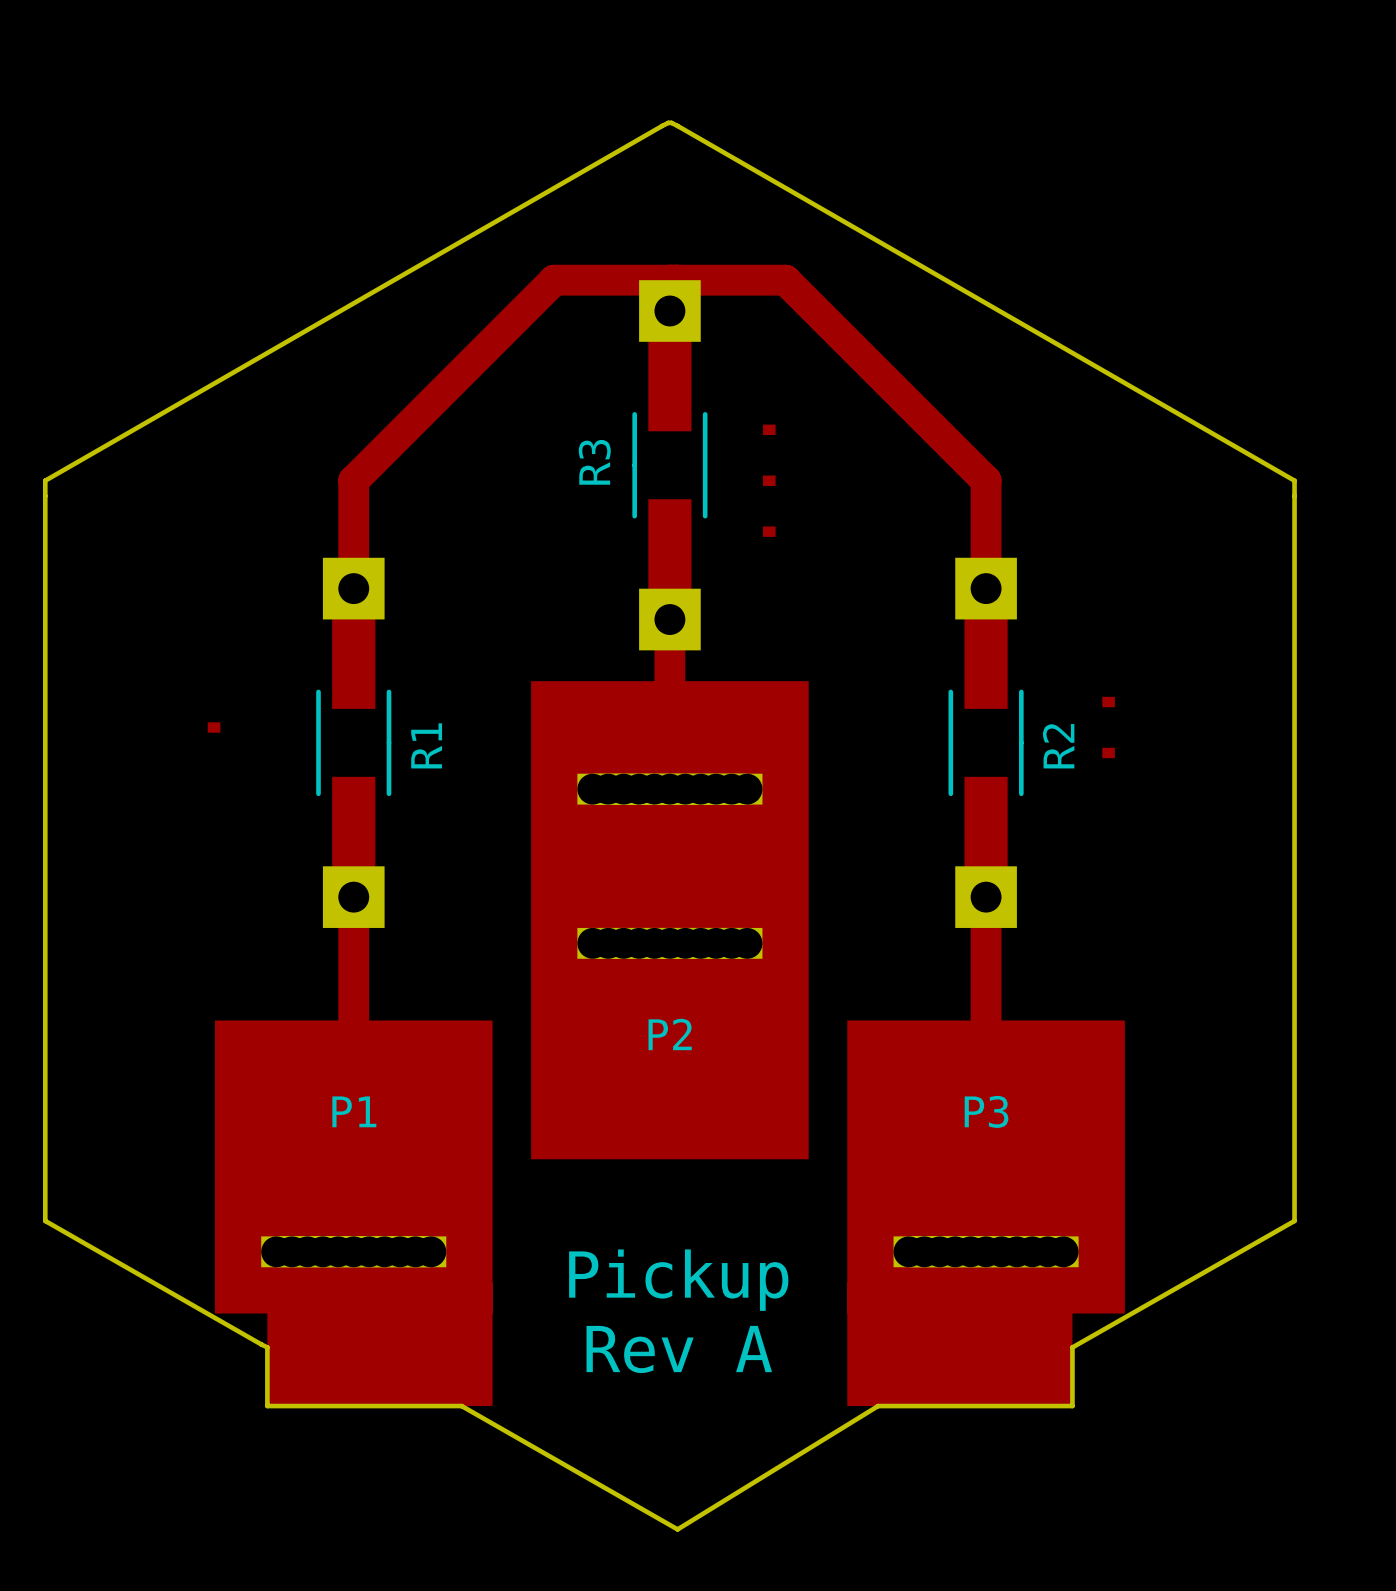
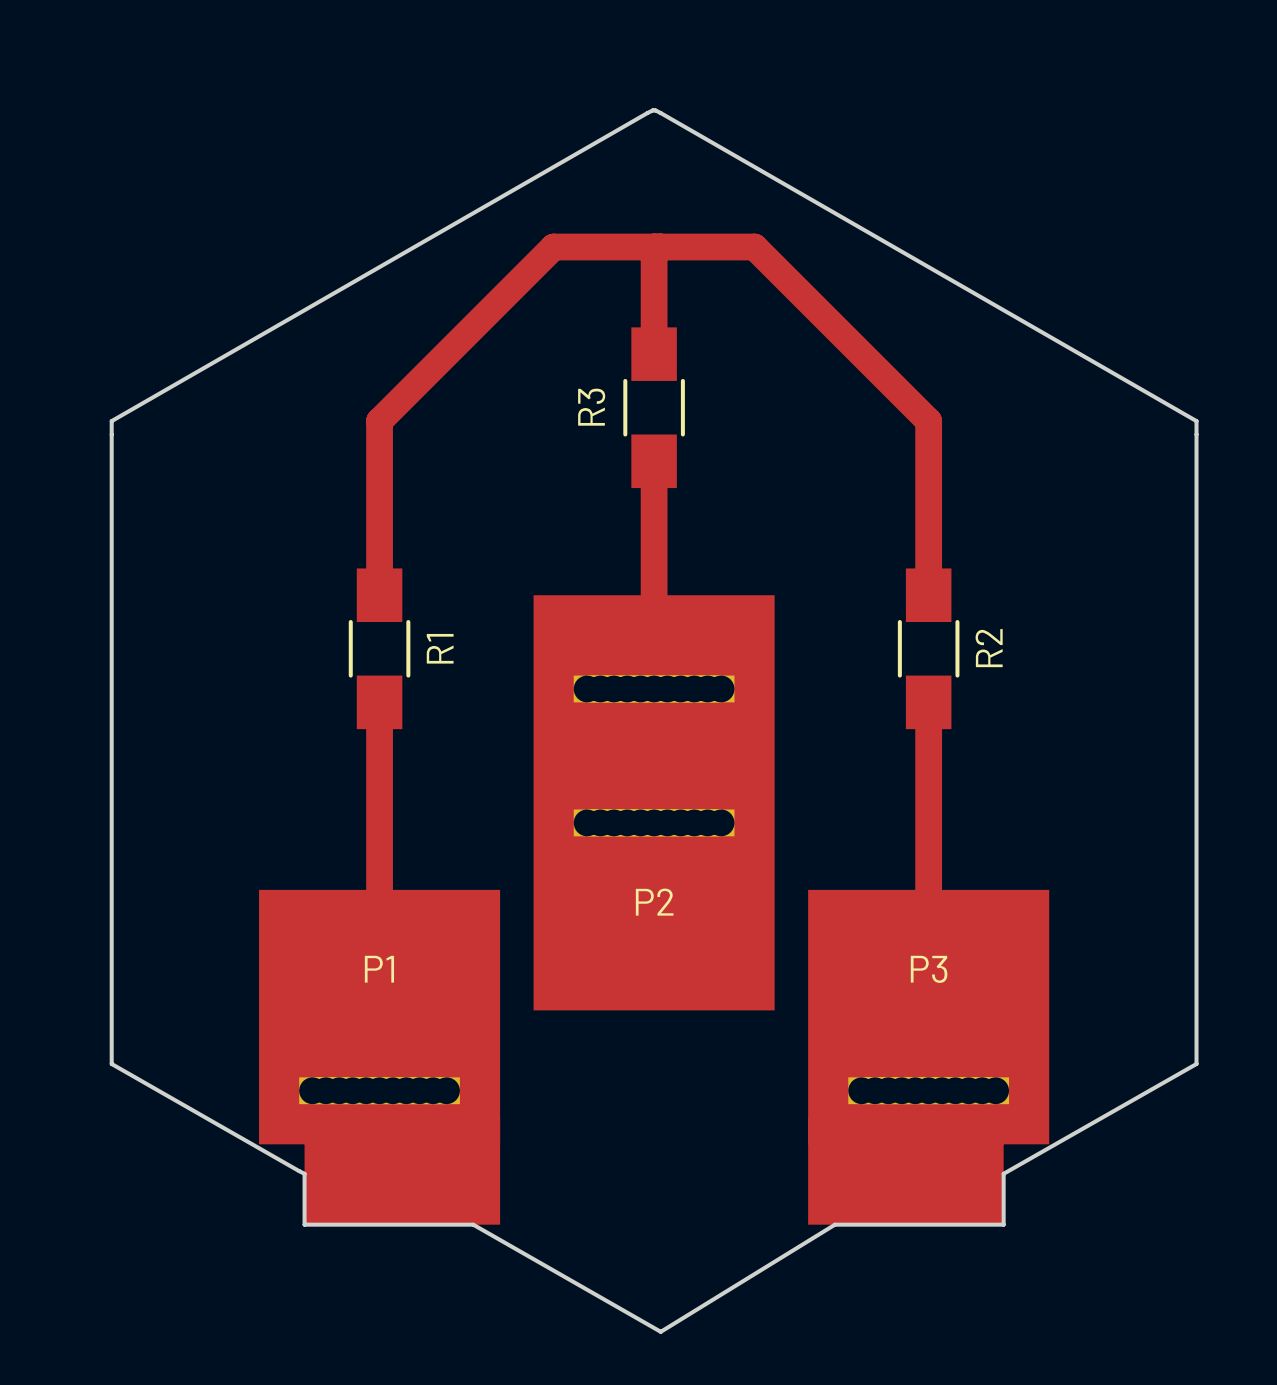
R3 footprint: [632, 280, 708, 651] -> [623, 327, 685, 489]
text: ··· (769, 480) -> none
R1 footprint: [316, 557, 392, 928] -> [348, 568, 411, 730]
R2 footprint: [948, 557, 1024, 928] -> [897, 568, 960, 730]
text: · (214, 727) -> none
text: ·· (1108, 727) -> none
text: Pickup (678, 1280) -> none
text: Rev A (679, 1349) -> none

